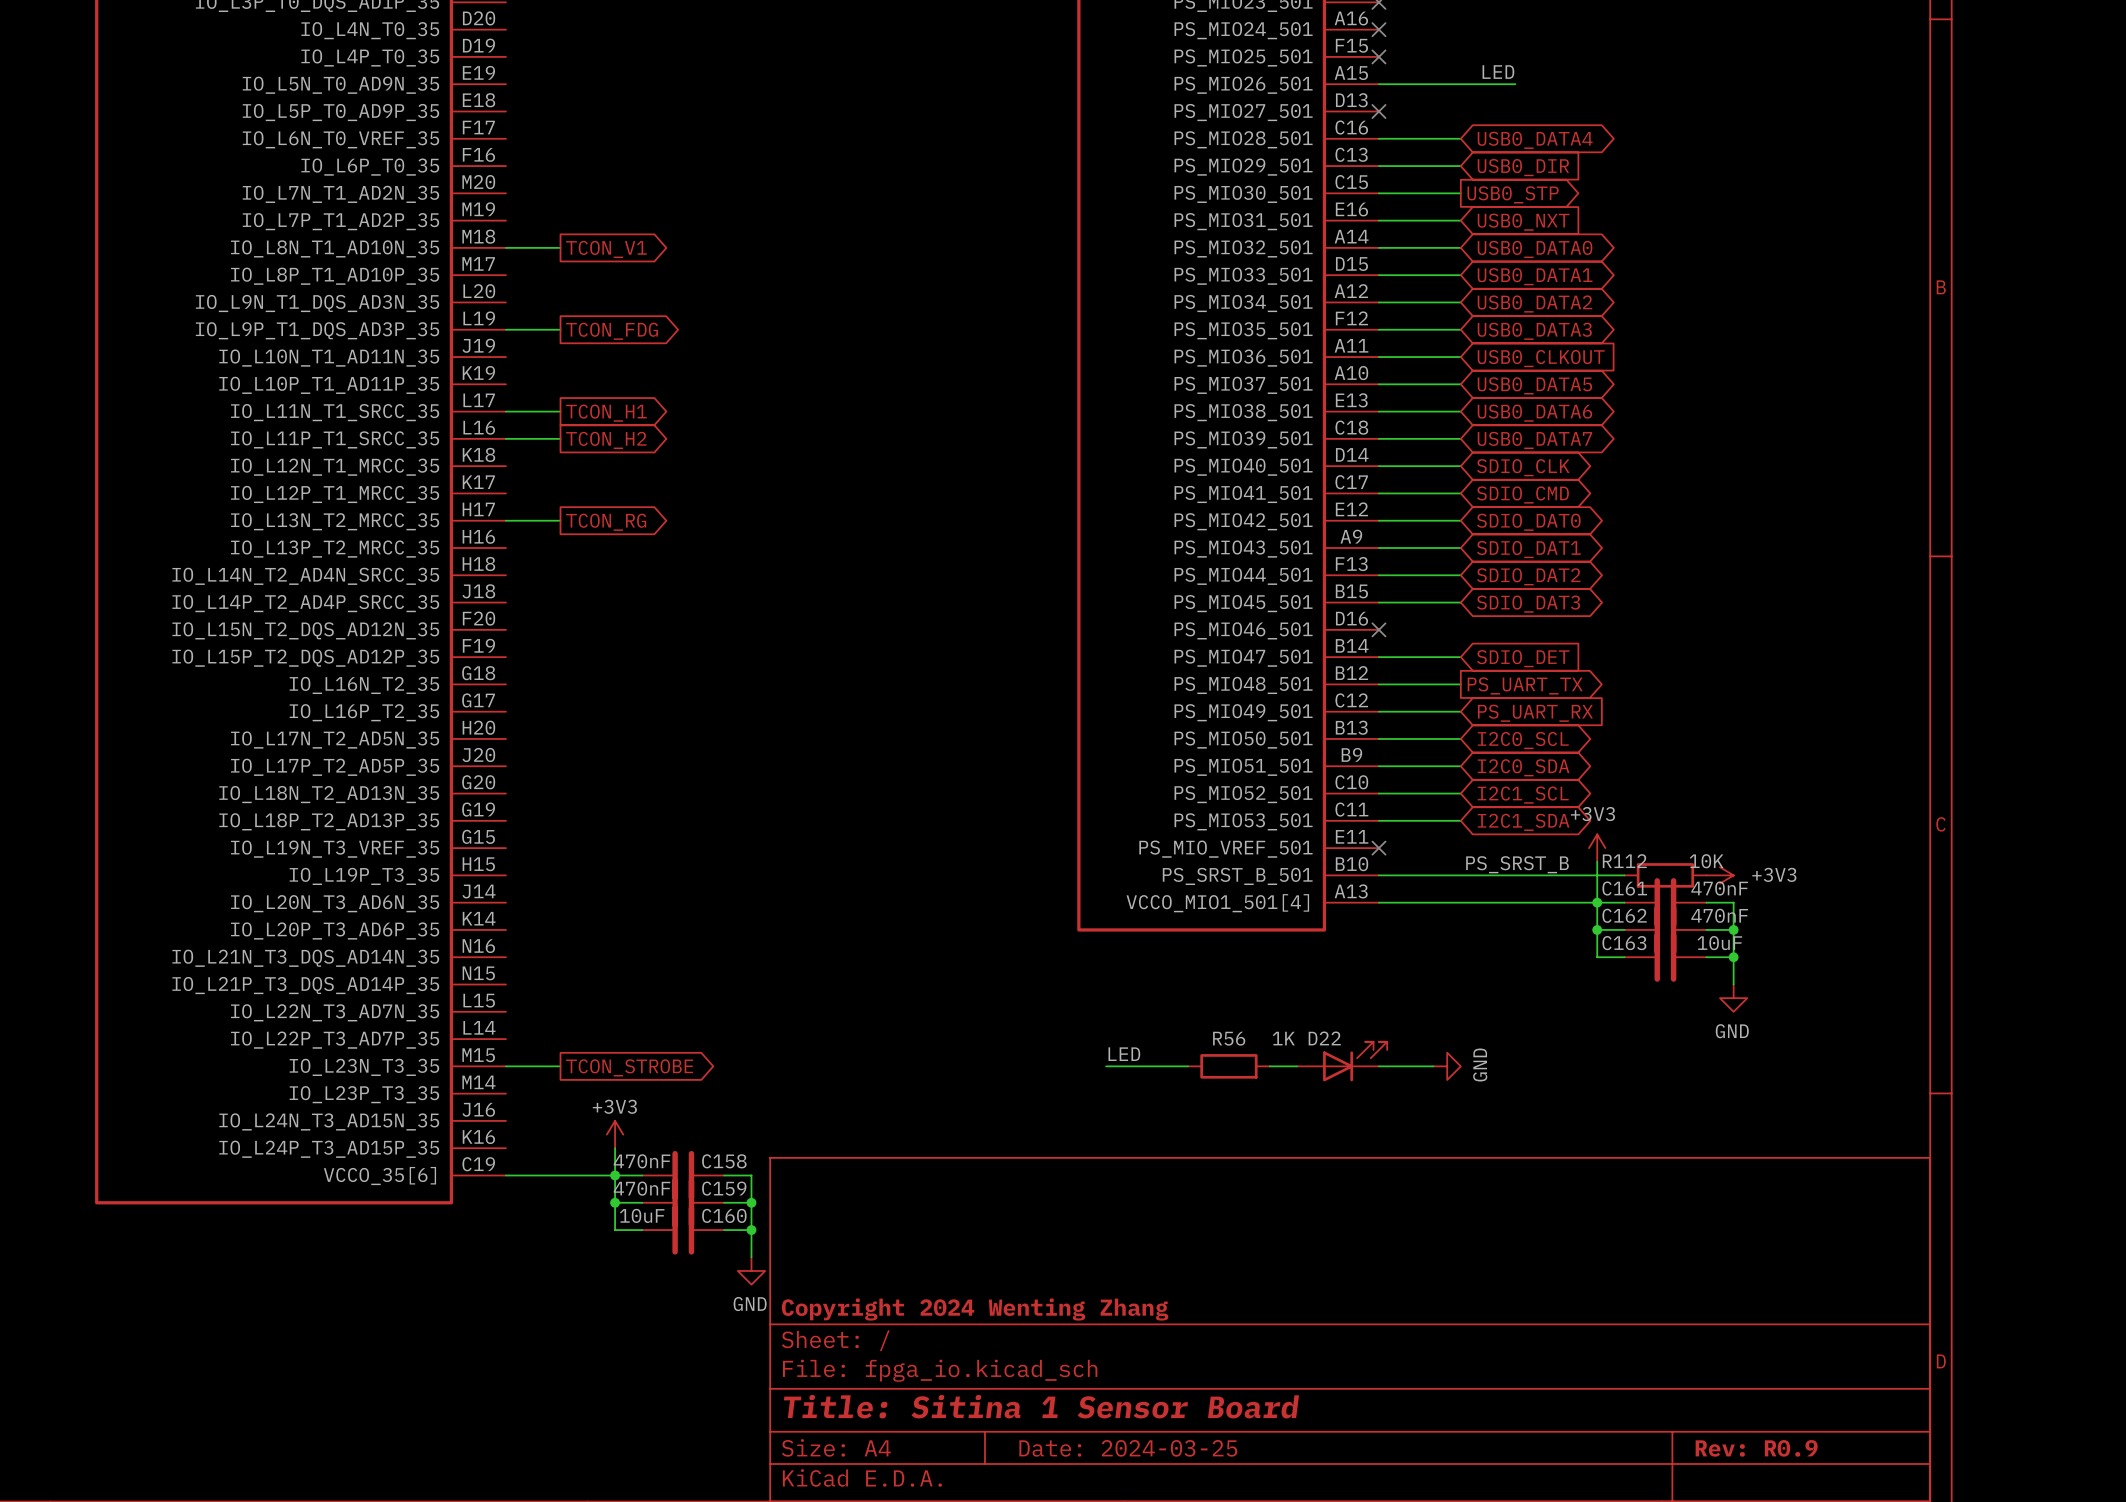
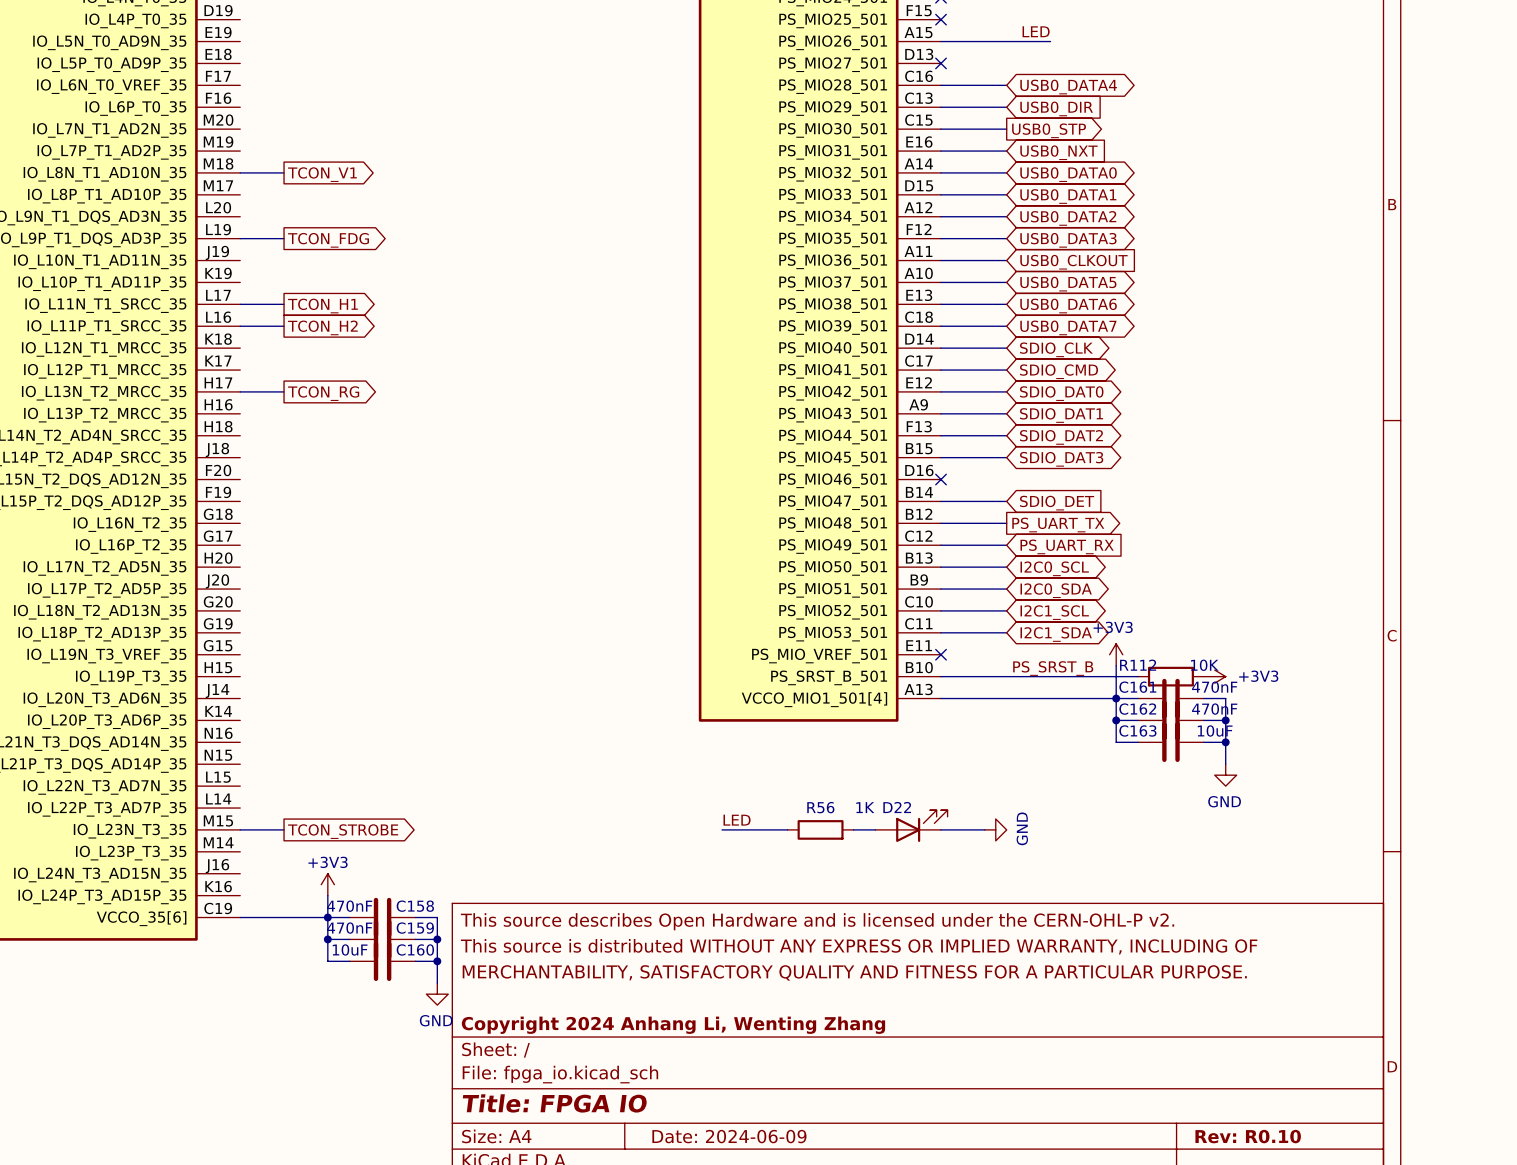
title block: none -> This source describes Open Hardware and is licensed under the CERN-OHL-P v2. (817, 921)
title block: none -> This source is distributed WITHOUT ANY EXPRESS OR IMPLIED WARRANTY, INCLUDING OF (859, 946)
title block: none -> MERCHANTABILITY, SATISFACTORY QUALITY AND FITNESS FOR A PARTICULAR PURPOSE. (854, 972)
title block: Copyright 2024 Wenting Zhang (975, 1309) -> Copyright 2024 Anhang Li, Wenting Zhang (673, 1025)
title block: Title: Sitina 1 Sensor Board (1041, 1406) -> Title: FPGA IO (554, 1103)
title block: Date: 2024-03-25 (1128, 1448) -> Date: 2024-06-09 (729, 1136)
title block: Rev: R0.9 (1756, 1448) -> Rev: R0.10 (1248, 1136)

